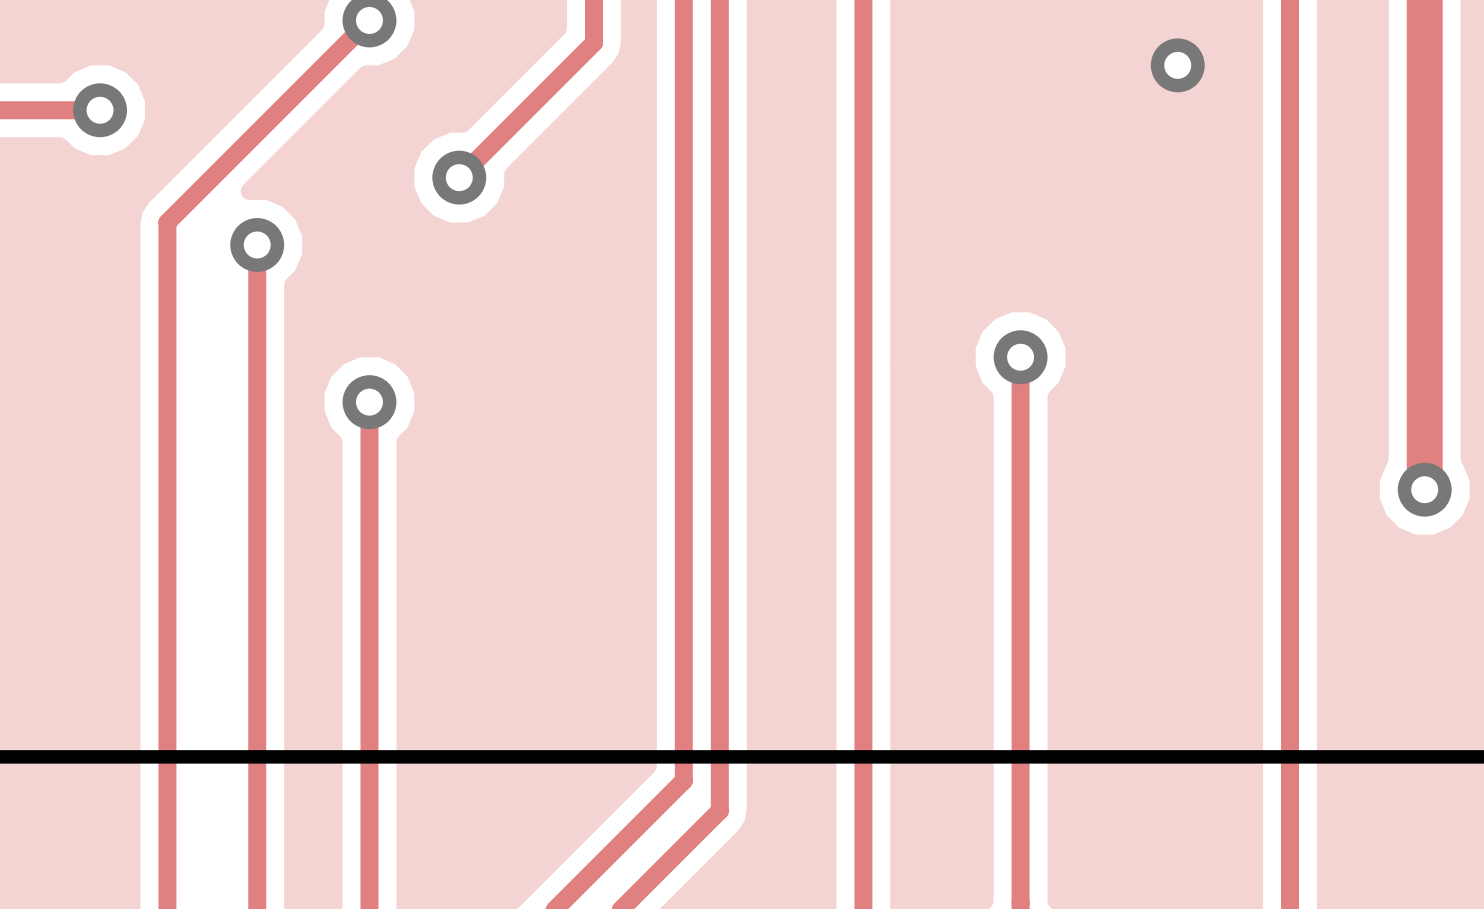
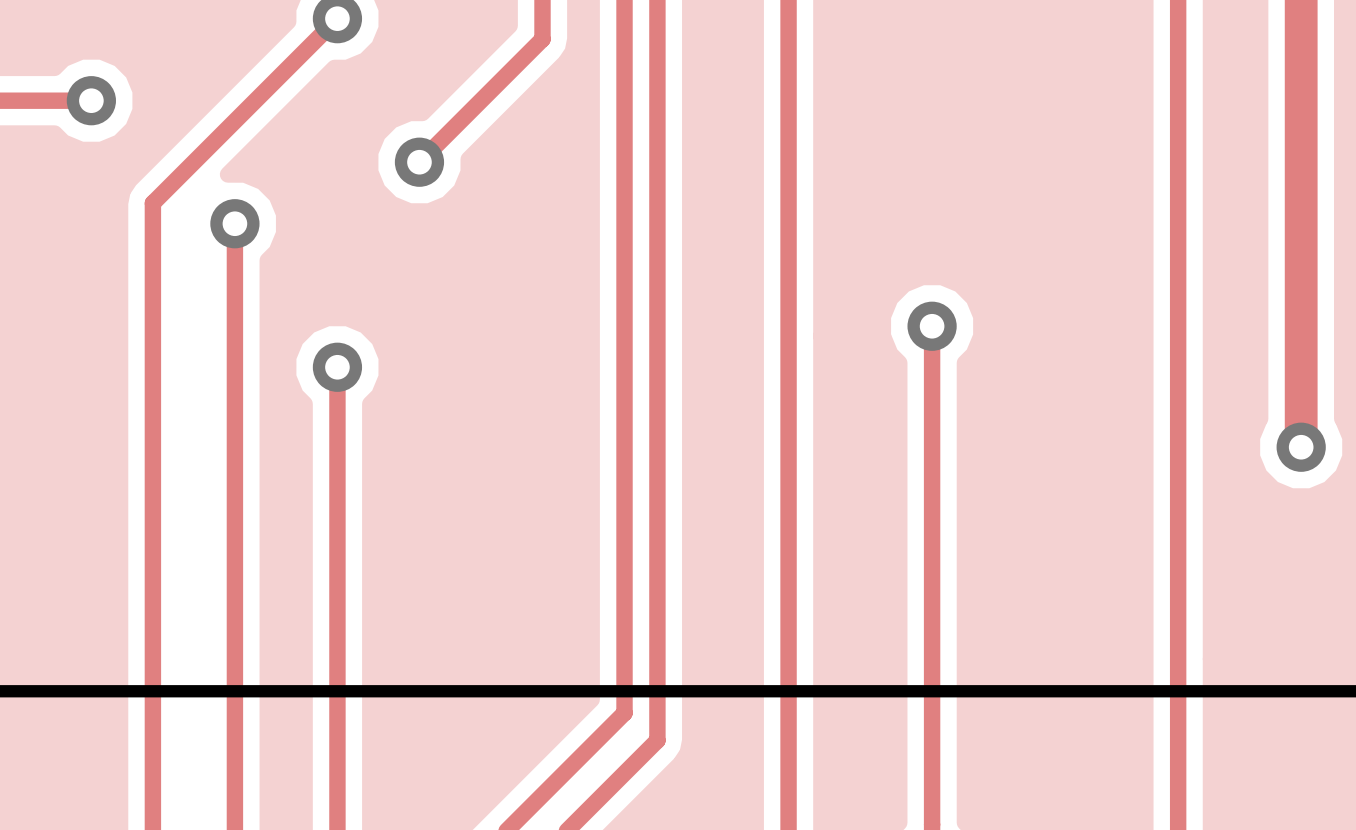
via: (1177, 65) -> none

